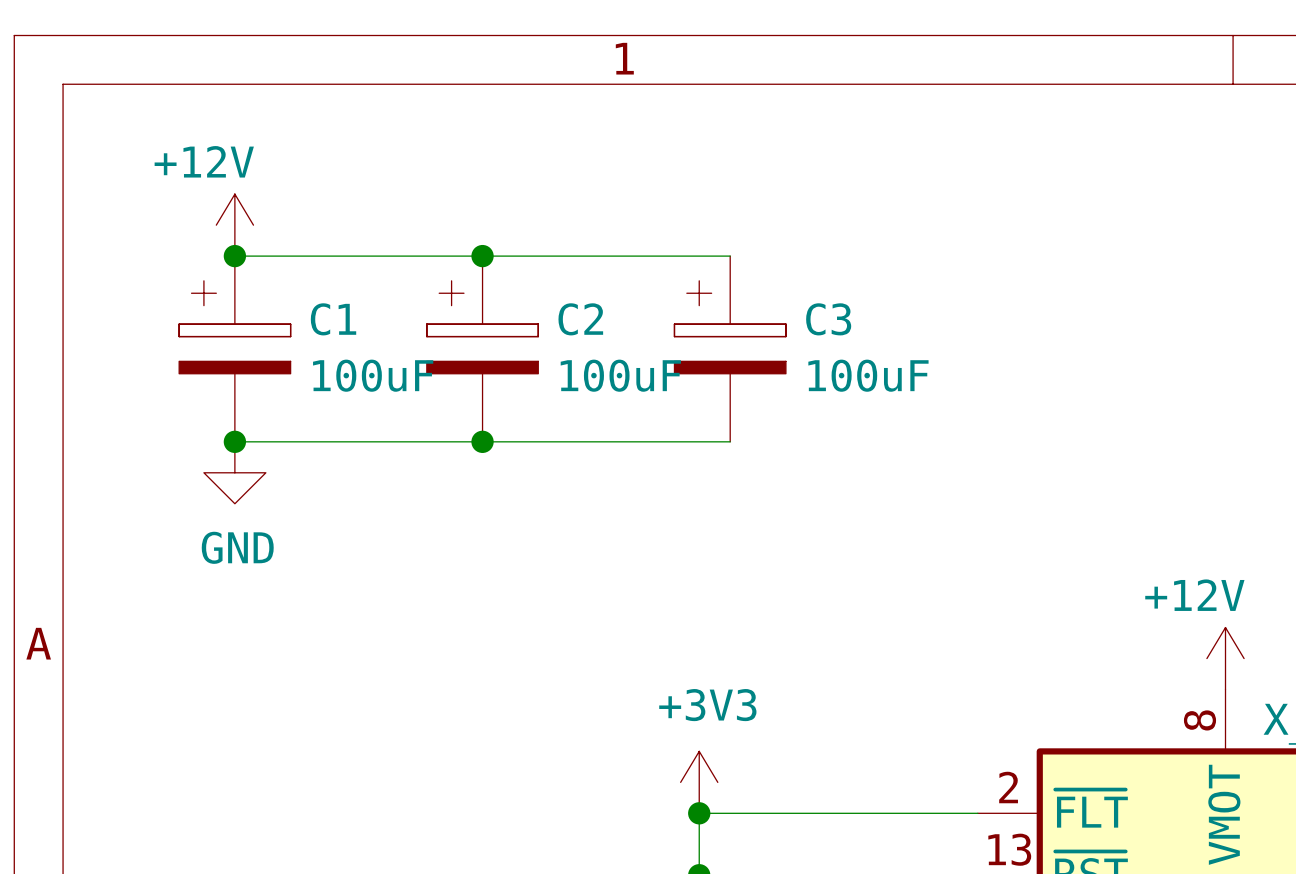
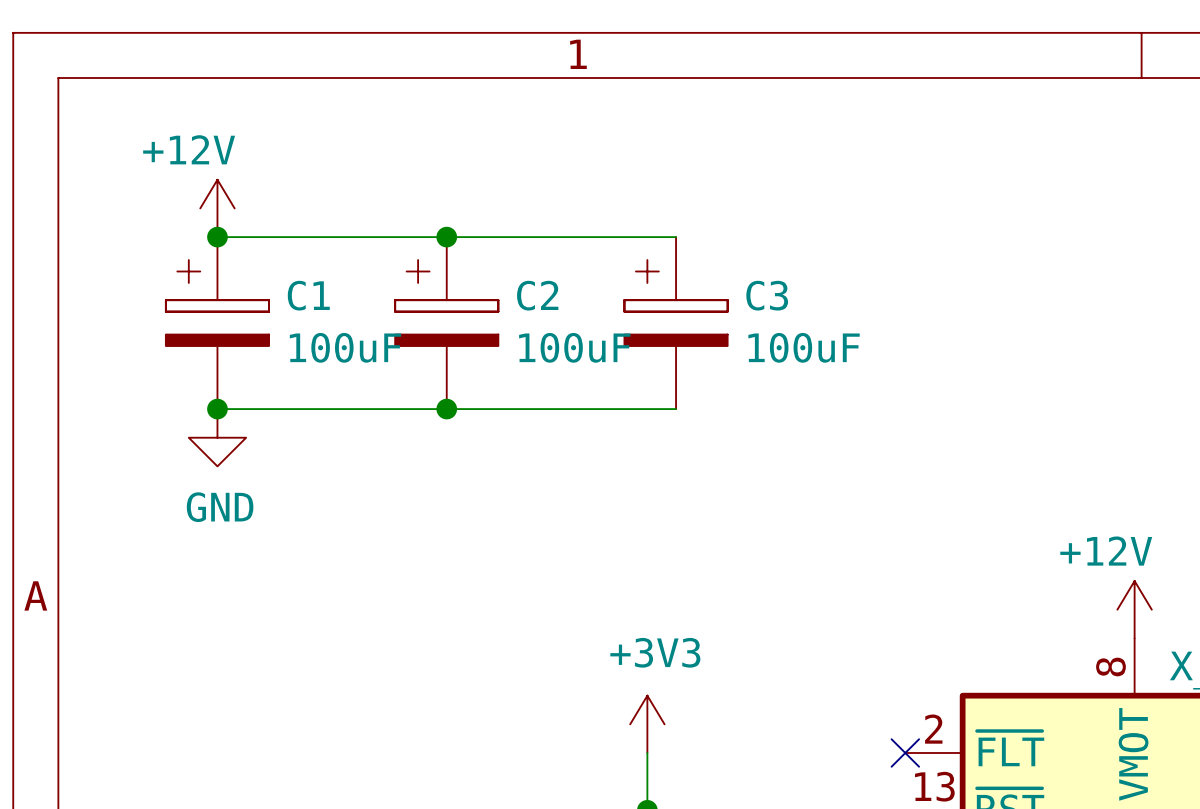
wire: (699, 813) (977, 813) -> none
junction: (699, 813) -> none
no-connect mark: none -> (905, 752)

